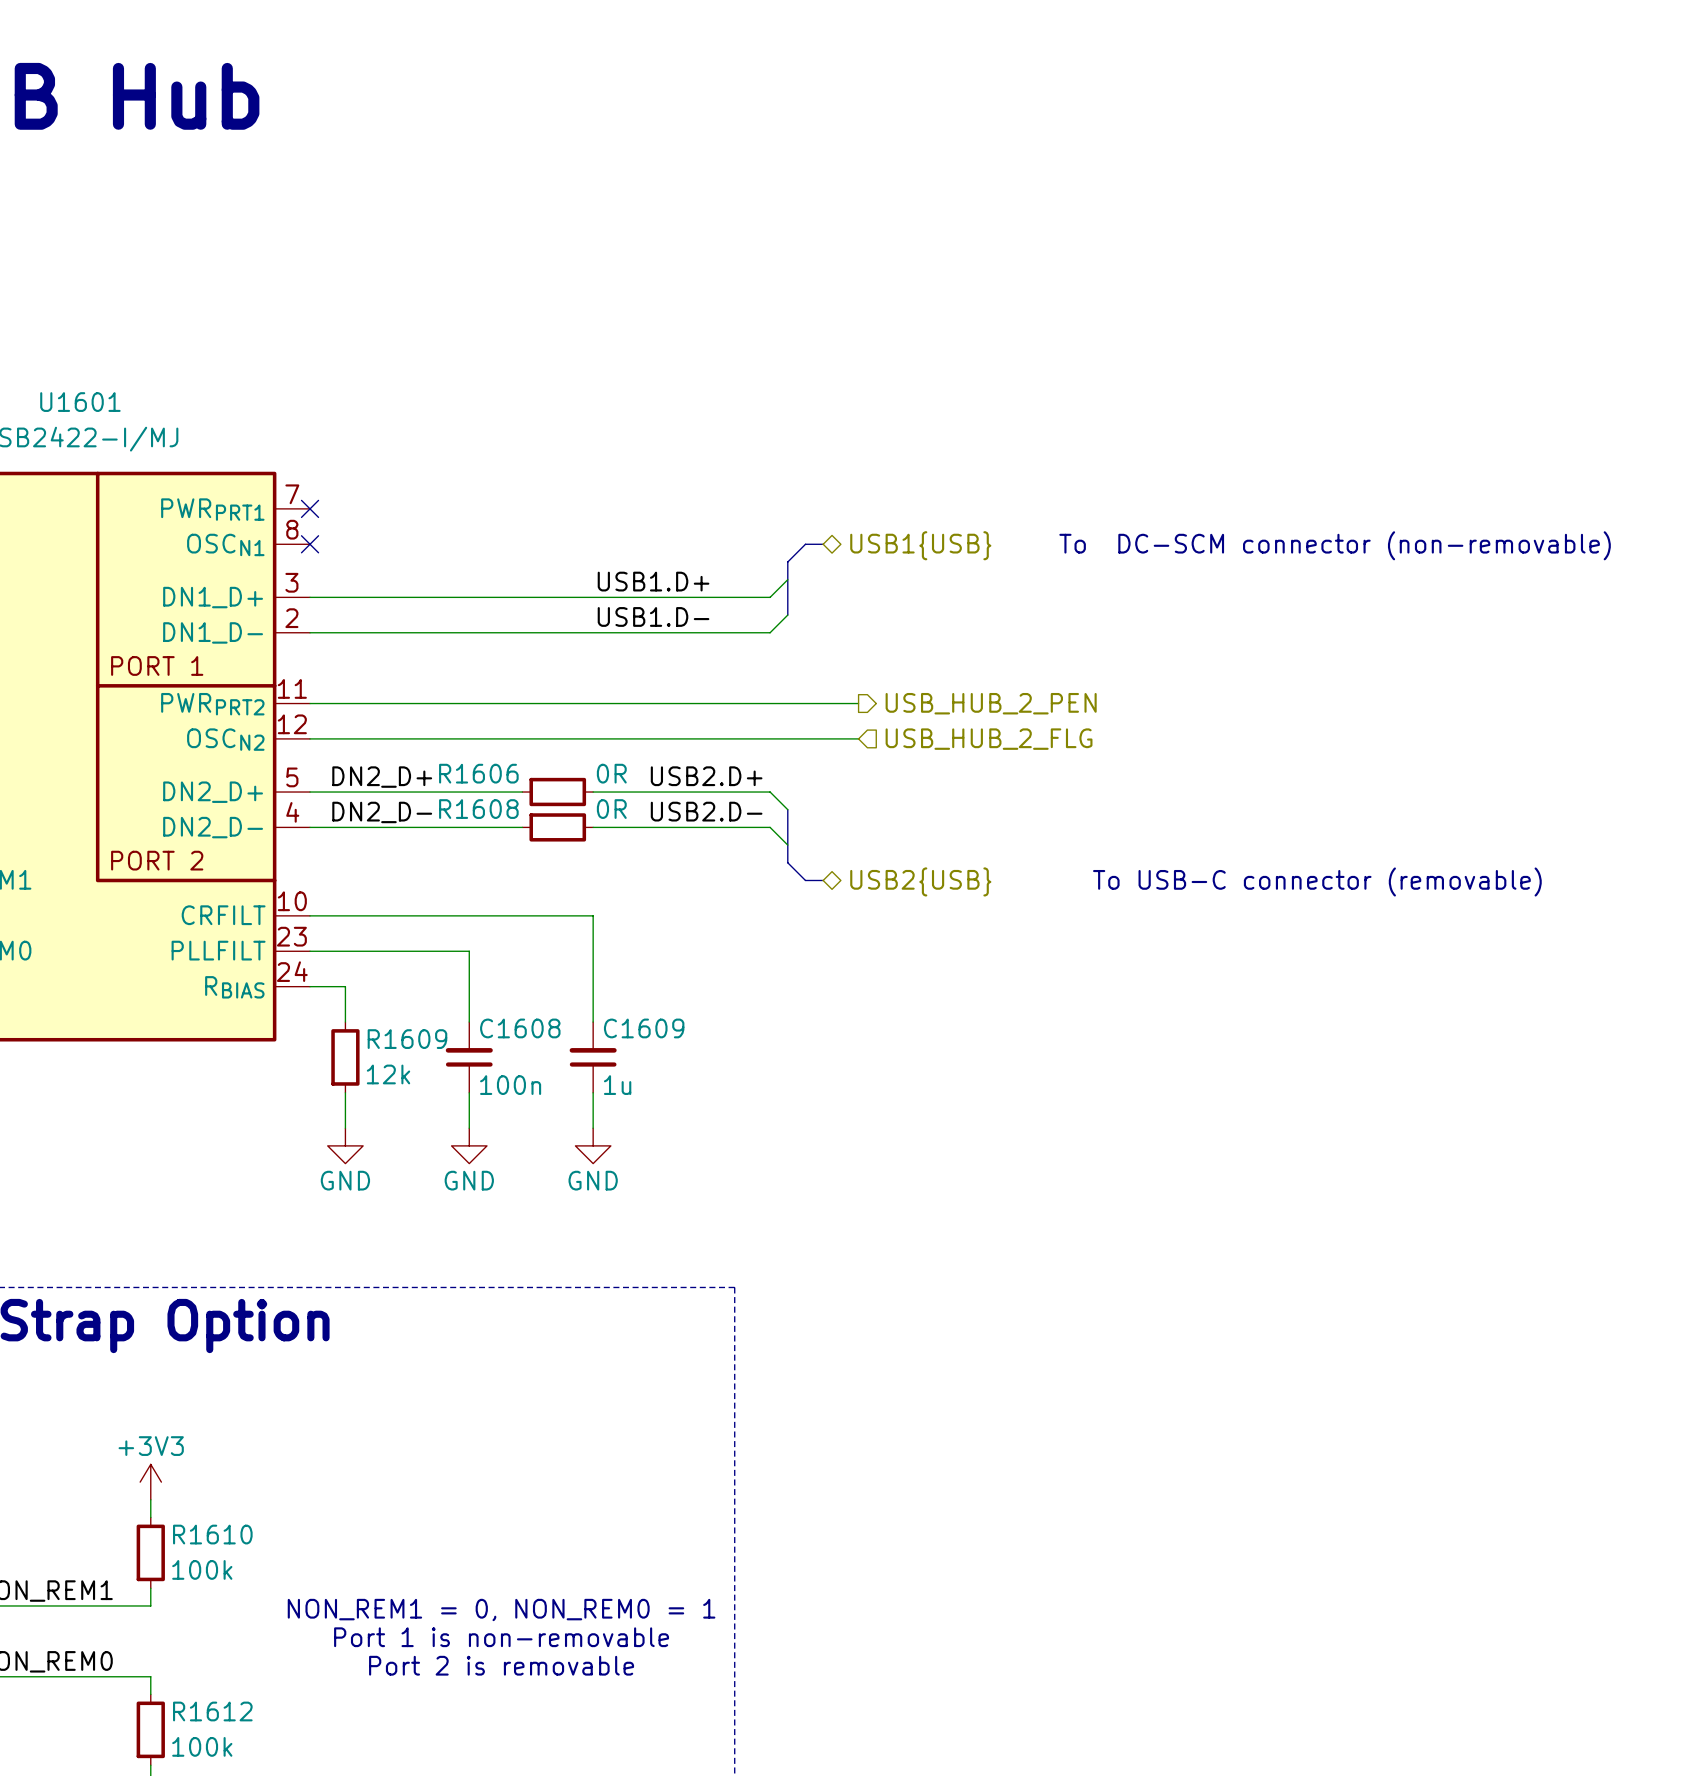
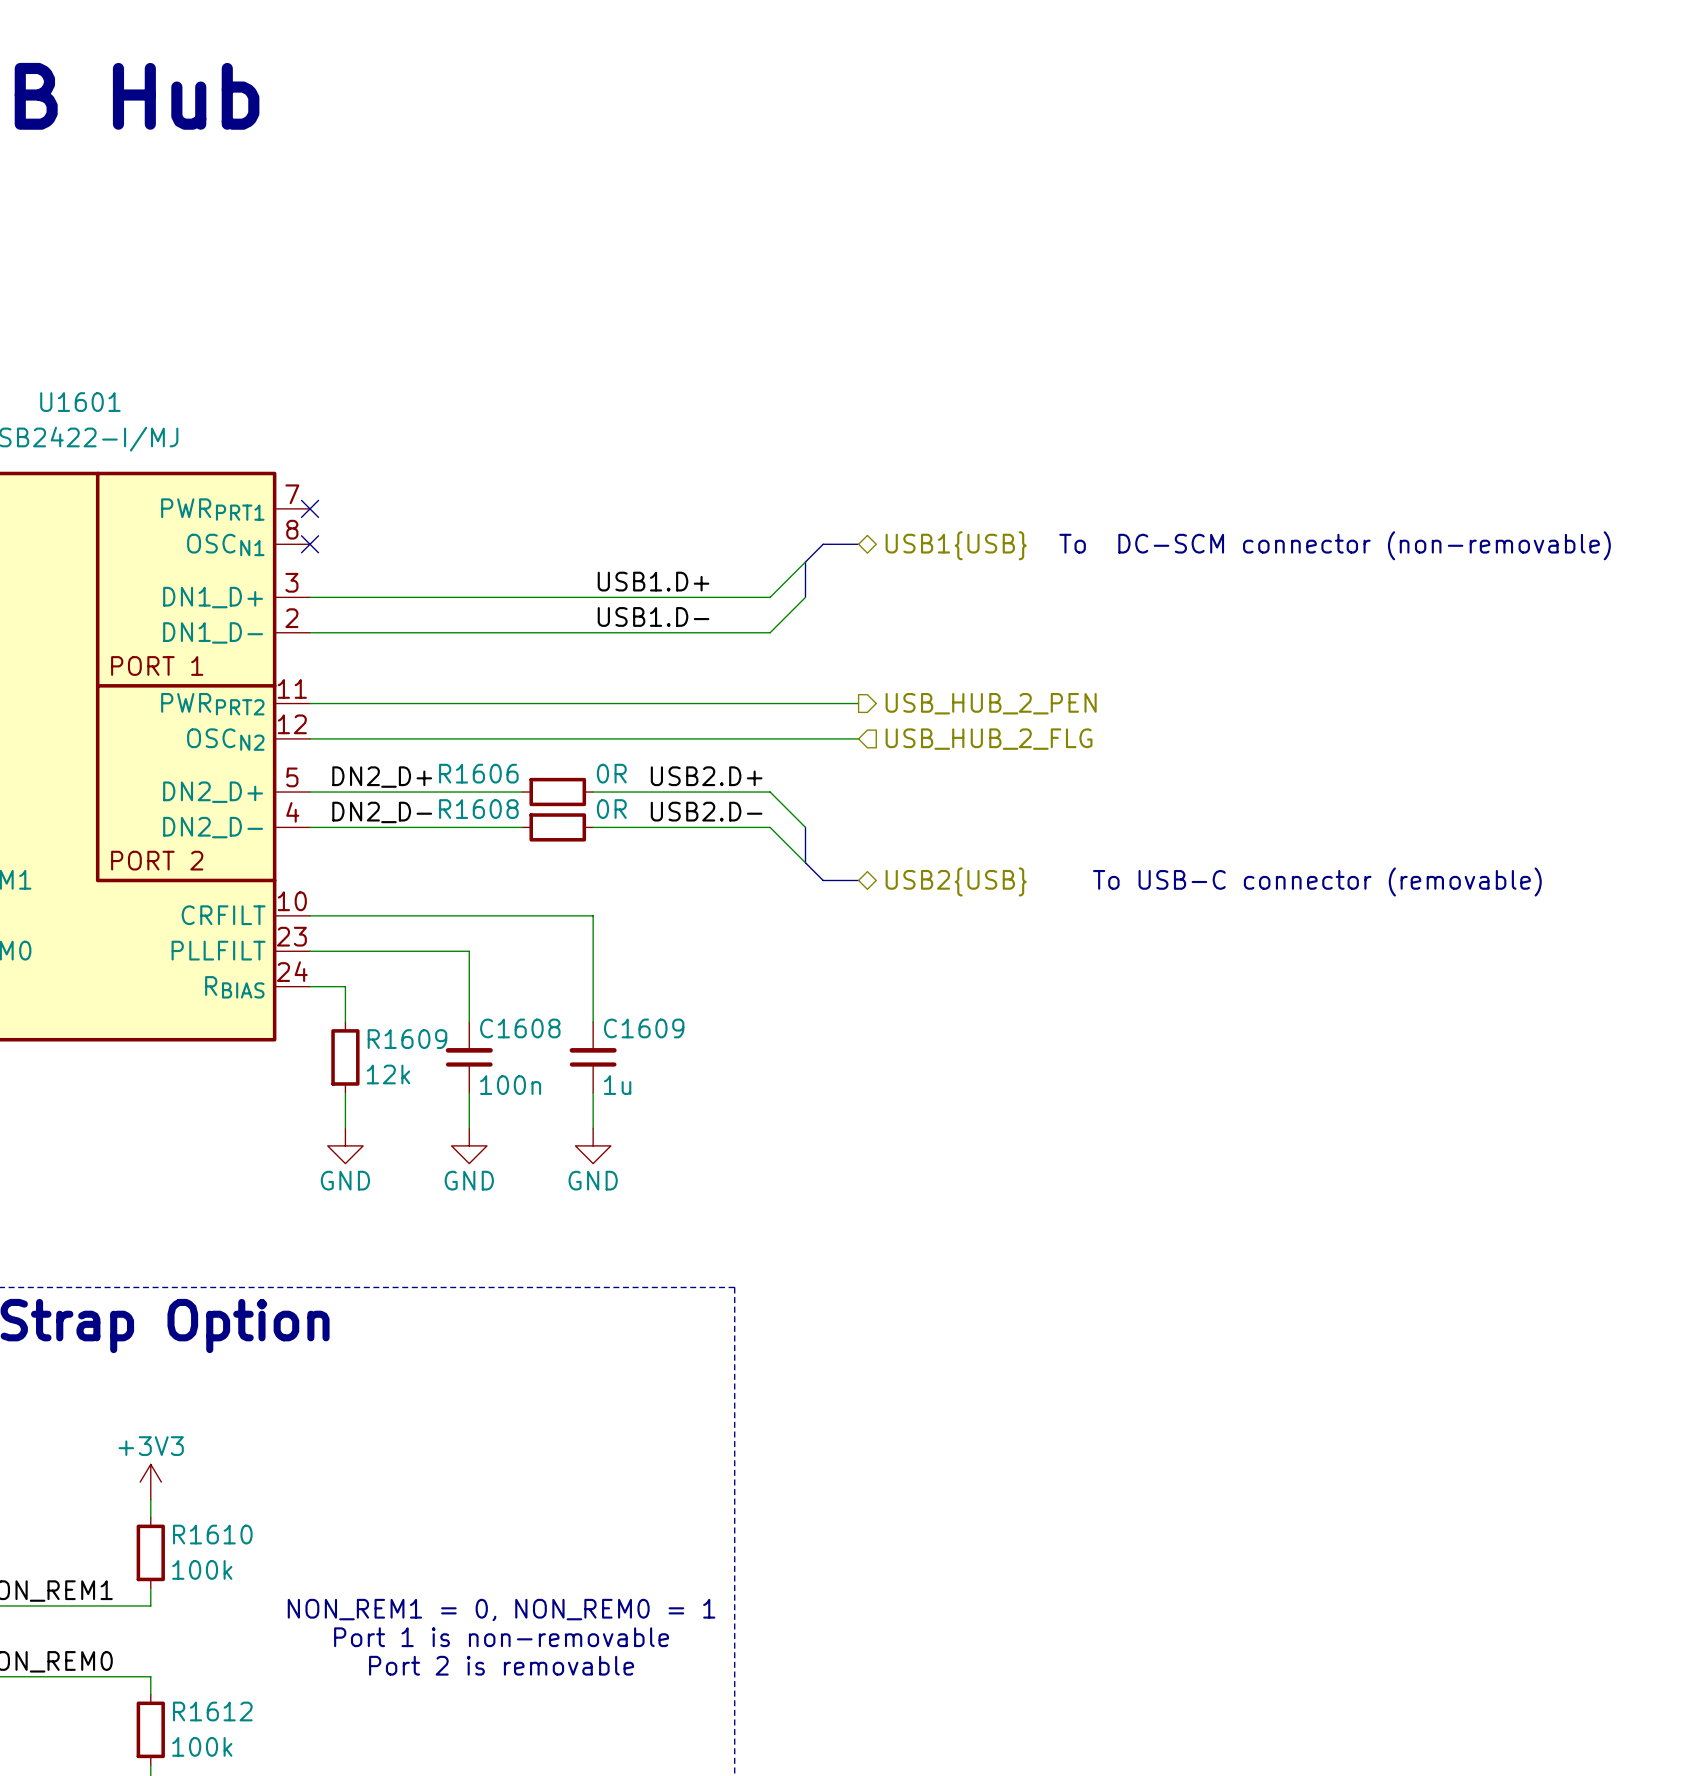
bus: (823, 544) (805, 544) (787, 561) (787, 615) -> none
bus: none -> (858, 544) (823, 544) (805, 561) (805, 597)
hierarchical label position: USB1{USB} (920, 545) -> USB1{USB} (956, 545)
wire: none -> (805, 561) (787, 579)
wire: none -> (805, 597) (787, 615)
wire: none -> (787, 809) (805, 827)
bus: (787, 809) (787, 862) (805, 880) (823, 880) -> none
bus: none -> (805, 827) (805, 862) (823, 880) (858, 880)
wire: none -> (787, 845) (805, 862)
hierarchical label position: USB2{USB} (920, 881) -> USB2{USB} (956, 881)

